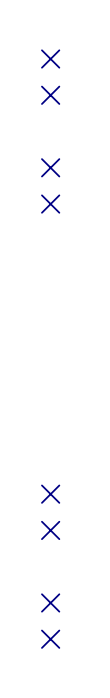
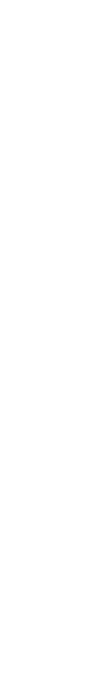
no-connect mark: (50, 59) -> none
no-connect mark: (50, 95) -> none
no-connect mark: (50, 167) -> none
no-connect mark: (50, 204) -> none
no-connect mark: (50, 494) -> none
no-connect mark: (50, 530) -> none
no-connect mark: (50, 602) -> none
no-connect mark: (50, 639) -> none

